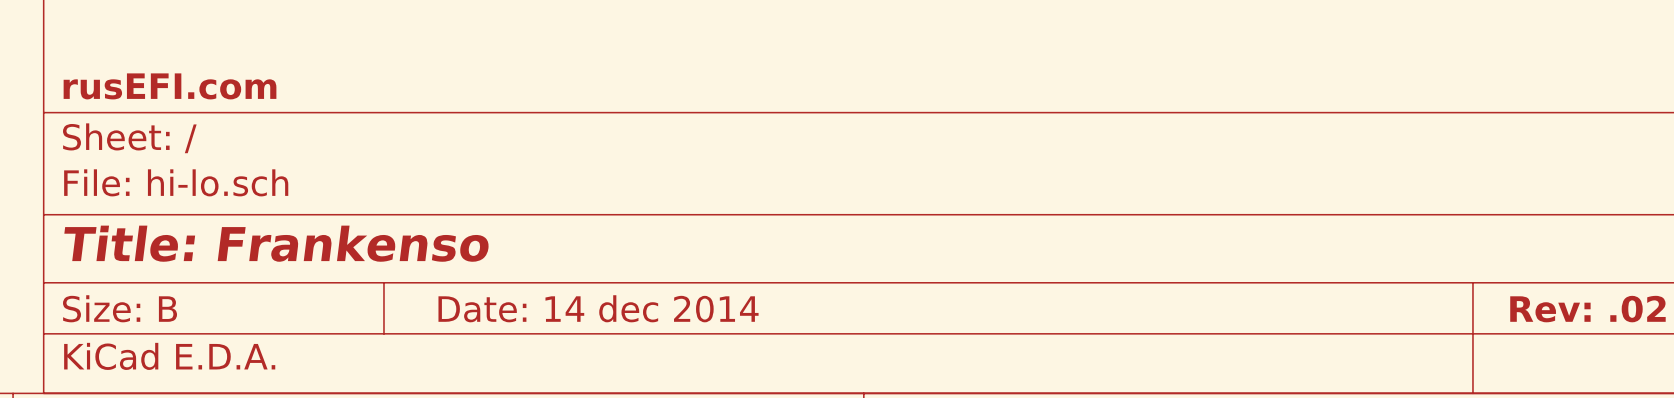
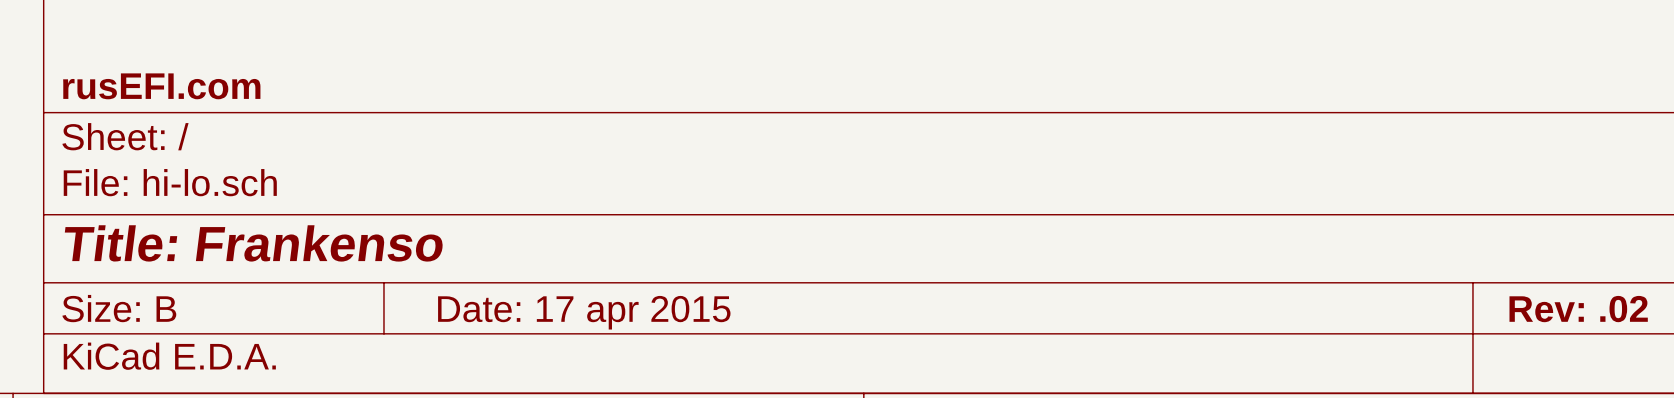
title block: Date: 14 dec 2014 (598, 308) -> Date: 17 apr 2015 (584, 312)

